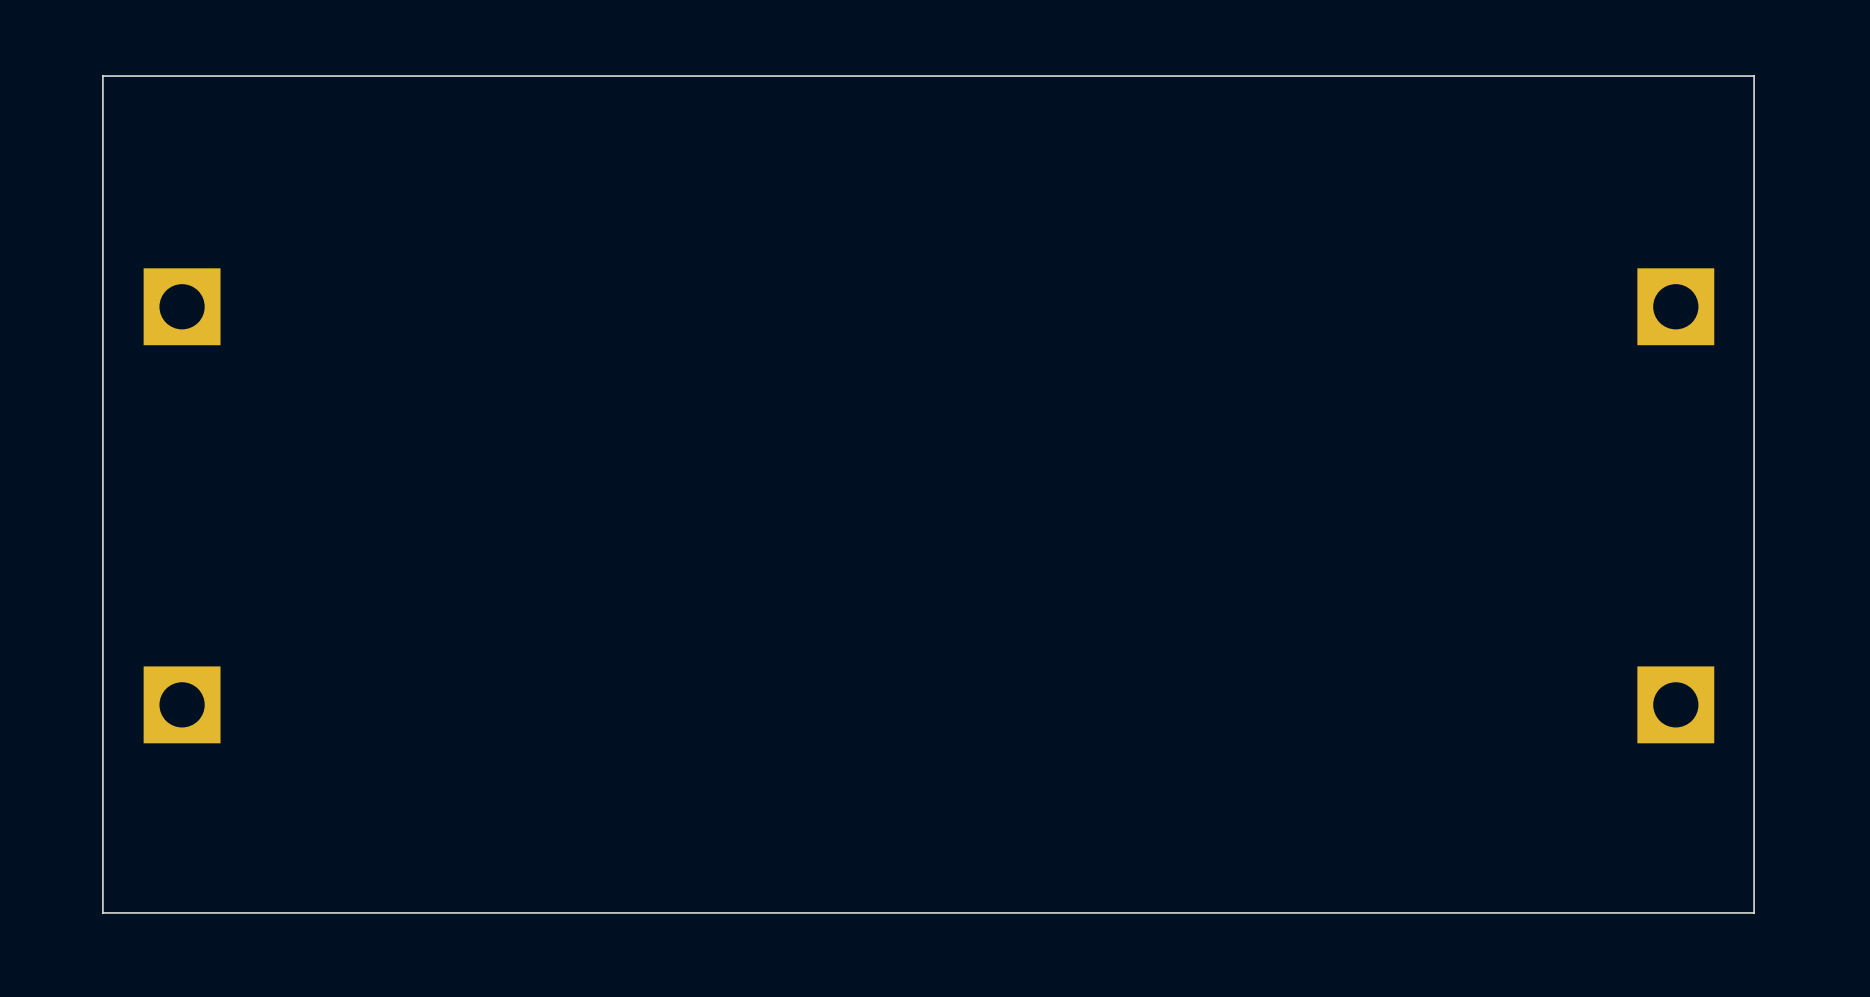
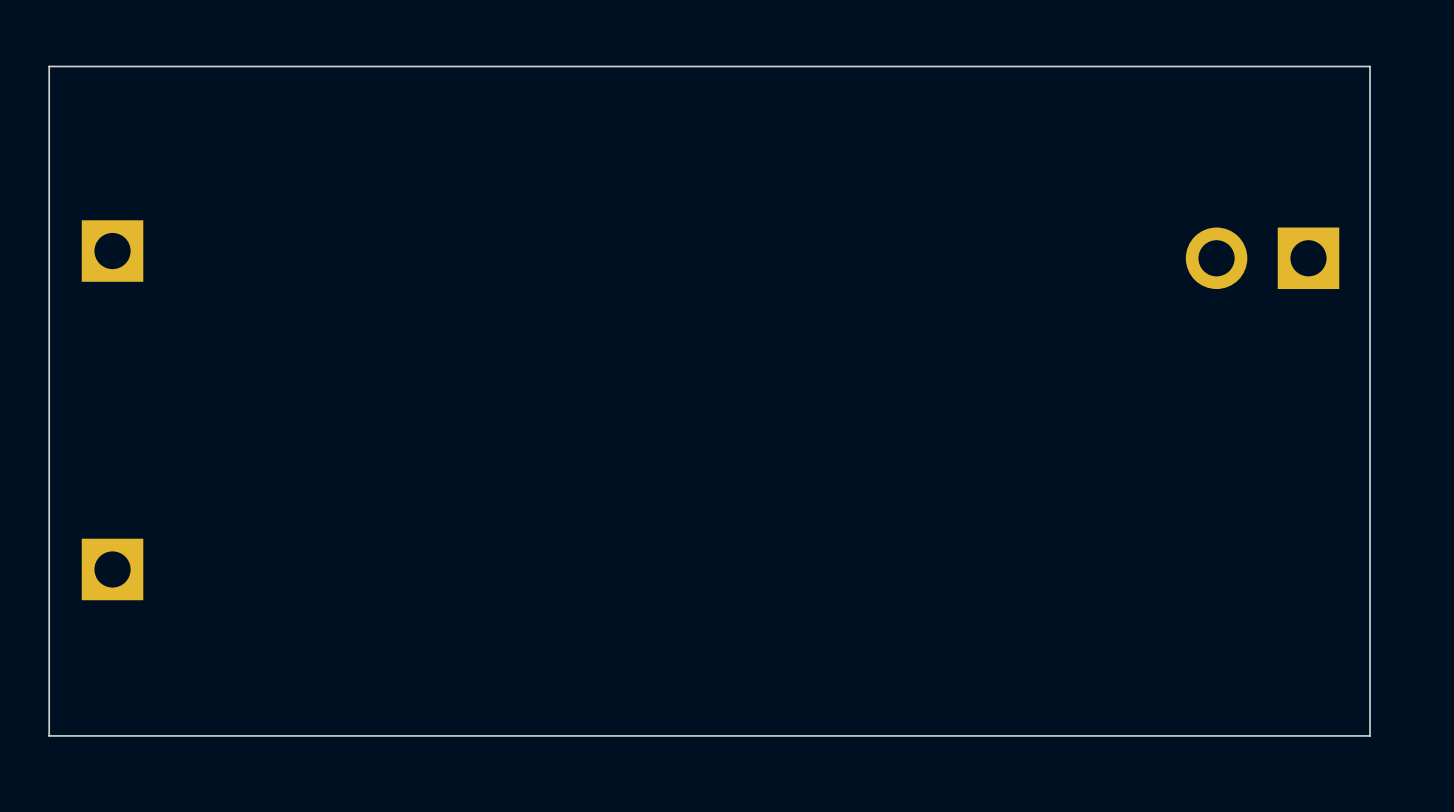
part: (1675, 306) -> none
part: none -> (1262, 258)
part: (1675, 704) -> none

